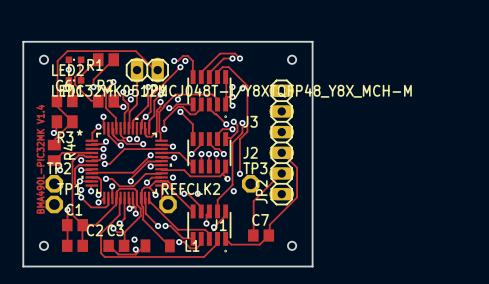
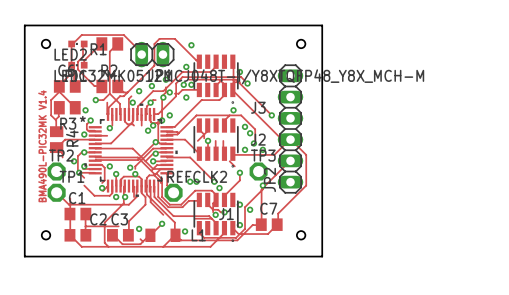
track: (78, 51) (67, 51) (57, 61) (56, 101) -> (81, 35) (71, 43)
track: (119, 51) (135, 51) (154, 69) (157, 70) -> (123, 35) (141, 54)
track: (232, 58) (223, 58) (210, 72) (209, 77) -> none
via: (232, 58) -> none
track: (239, 58) (235, 53) (220, 53) (201, 72) (201, 77) -> none
via: (239, 58) -> none
track: (174, 61) (177, 61) (182, 56) (187, 56) (192, 61) (192, 75) -> (108, 114) (108, 107) (120, 96) (123, 96) (154, 65) (154, 43) (159, 38) (174, 38) (196, 60) (199, 60)
via: (174, 61) -> none
track: (106, 67) (93, 79) (93, 87) -> (109, 51) (109, 74)
track: (180, 67) (150, 96) (150, 111) (148, 114) -> (155, 100) (153, 100)
via: (180, 67) -> none
via: (68, 69) -> none
track: (137, 70) (137, 104) (129, 111) (128, 128) -> none
track: (217, 77) (217, 72) (222, 67) (228, 67) (247, 85) (247, 131) (239, 139) (239, 173) -> none
track: (113, 82) (106, 89) -> (153, 153) (145, 161)
via: (113, 82) -> none
via: none -> (186, 66)
via: (93, 87) -> none
track: (148, 87) (148, 105) -> (216, 61) (215, 66) (210, 72) (182, 72) (163, 91) (153, 91)
via: (148, 87) -> none
via: (242, 88) -> none
track: (123, 92) (123, 99) (128, 104) (127, 110) -> none
via: (123, 92) -> none
via: (130, 92) -> none
track: (160, 94) (154, 100) (154, 115) (149, 120) (149, 127) -> (247, 83) (241, 77) (182, 77) (176, 83) (176, 96) (158, 114) (154, 114)
track: (182, 94) (175, 94) (159, 111) (161, 140) -> (224, 89) (223, 96) (219, 100) (201, 100) (174, 126) (166, 127)
via: (232, 96) -> none
via: none -> (247, 83)
via: (130, 99) -> none
via: none -> (191, 84)
via: none -> (151, 86)
via: (160, 101) -> none
track: (201, 104) (200, 109) (195, 114) (190, 114) (182, 106) (177, 106) (164, 120) (164, 129) -> none
track: (209, 104) (210, 109) (226, 124) -> (216, 89) (216, 84) (222, 79) (236, 79) (271, 115)
track: none -> (232, 89) (285, 143) (290, 139) (274, 154) (232, 153)
via: none -> (139, 91)
via: (232, 105) -> none
via: (123, 106) -> none
via: none -> (169, 92)
track: none -> (109, 93) (103, 100) (95, 100)
via: (169, 108) -> none
via: none -> (163, 97)
track: (180, 111) (192, 124) (193, 139) -> (204, 138) (199, 125)
via: none -> (95, 100)
via: (103, 116) -> none
via: none -> (132, 102)
track: (72, 121) (55, 139) (54, 145) -> (70, 74) (58, 86) (60, 91) (51, 100) (51, 115) (56, 120) (56, 131)
track: (233, 121) (237, 125) (237, 131) (231, 137) (225, 139) -> none
via: (233, 121) -> none
track: (242, 123) (242, 132) (232, 142) (232, 185) (217, 199) (217, 207) -> (239, 172) (239, 180) (224, 195)
via: (242, 123) -> none
via: none -> (85, 110)
track: (98, 126) (92, 132) (91, 140) -> none
via: (98, 126) -> none
track: (112, 128) (113, 135) (118, 140) (123, 140) (127, 144) (143, 144) -> none
track: none -> (239, 115) (255, 129) (253, 143)
via: (232, 129) -> none
via: none -> (271, 115)
via: (53, 132) -> none
via: none -> (90, 120)
via: none -> (162, 120)
track: (108, 135) (118, 145) (120, 145) -> (112, 121) (112, 125)
via: (129, 139) -> none
via: (137, 139) -> none
via: none -> (153, 125)
track: (209, 139) (210, 144) (223, 154) -> none
via: none -> (245, 126)
track: (106, 141) (103, 144) (91, 144) -> (90, 120) (86, 124) (86, 129) (95, 131)
via: (120, 145) -> none
via: (172, 146) -> none
via: none -> (250, 133)
via: none -> (84, 134)
track: (161, 148) (124, 149) (109, 163) (104, 163) -> (166, 135) (177, 134) (196, 115) (229, 115)
via: (103, 149) -> none
via: (191, 154) -> none
via: (208, 154) -> none
via: (216, 154) -> none
via: (223, 154) -> none
track: (103, 156) (99, 160) (91, 161) -> (160, 168) (153, 168) (132, 148) (95, 148)
via: (103, 156) -> none
via: none -> (253, 143)
track: (91, 157) (78, 155) (72, 161) (72, 214) (82, 225) (96, 224) (115, 204) (116, 197) -> (95, 143) (111, 143) (132, 121) (133, 114)
track: (161, 157) (174, 157) -> (166, 143) (158, 142) (158, 124) (162, 120)
via: (174, 157) -> none
via: (81, 160) -> none
via: none -> (245, 149)
via: none -> (262, 149)
via: (104, 163) -> none
via: none -> (84, 152)
track: (225, 166) (225, 171) (220, 176) (190, 176) -> (214, 181) (196, 163)
track: (91, 169) (81, 170) -> (95, 156) (137, 157) (162, 179) (162, 197)
via: (60, 170) -> none
via: (81, 170) -> none
via: none -> (74, 161)
track: (148, 173) (145, 173) (133, 186) (119, 186) (112, 178) (106, 178) -> none
via: none -> (153, 161)
via: (239, 173) -> none
via: (172, 177) -> none
via: none -> (84, 166)
via: (227, 178) -> none
via: none -> (130, 167)
via: (79, 181) -> none
via: (130, 181) -> none
track: (161, 181) (168, 181) (170, 183) (170, 188) (193, 211) -> (158, 179) (158, 197) (168, 207) (182, 207) (188, 200) (199, 199)
via: (146, 182) -> none
via: none -> (79, 172)
track: (91, 185) (91, 191) -> (95, 173) (79, 172)
via: none -> (239, 172)
via: none -> (135, 174)
via: (81, 190) -> none
via: (91, 191) -> none
via: (233, 191) -> none
track: (184, 193) (187, 193) (200, 206) (201, 211) -> (224, 212) (213, 209) (208, 204) (207, 199)
via: none -> (196, 181)
via: (197, 193) -> none
via: none -> (214, 181)
via: (98, 194) -> none
via: (155, 194) -> none
via: (81, 197) -> none
track: (124, 197) (124, 218) (119, 223) -> none
track: (132, 197) (135, 213) -> (137, 186) (136, 197) (128, 204) (68, 204) (56, 192)
via: none -> (262, 185)
via: none -> (102, 188)
via: none -> (219, 188)
track: (149, 201) (156, 208) -> (154, 189) (154, 197) (173, 216) (209, 216) (211, 218)
via: (98, 202) -> none
track: (143, 207) (143, 219) (169, 245) -> (148, 195) (174, 222) (174, 235) (163, 246)
via: none -> (116, 197)
via: none -> (125, 197)
via: (129, 208) -> none
via: (67, 209) -> none
track: (225, 211) (225, 216) (213, 227) -> none
via: (135, 213) -> none
track: (164, 216) (177, 229) (189, 229) -> (169, 204) (181, 204) (195, 190) (211, 190) (215, 194) (216, 199)
via: none -> (239, 204)
via: none -> (250, 209)
via: (119, 223) -> none
via: (206, 223) -> none
via: none -> (224, 212)
via: (158, 225) -> none
track: (165, 225) (170, 225) (182, 238) (193, 238) -> (262, 185) (262, 189) (245, 207) (245, 228) (236, 237) (204, 237) (200, 234) (199, 228)
via: (165, 225) -> none
via: none -> (215, 214)
via: (213, 227) -> none
track: (113, 228) (117, 232) (124, 232) -> none
via: (113, 228) -> none
track: none -> (162, 223) (150, 235)
via: none -> (162, 223)
via: none -> (239, 225)
track: none -> (261, 224) (252, 225) (237, 240) (181, 240) (175, 235)
track: none -> (85, 226) (118, 226)
track: (201, 238) (200, 244) (196, 248) (190, 248) (184, 242) (179, 242) -> none
track: none -> (70, 235) (81, 246) (108, 246)
via: (135, 249) -> none

